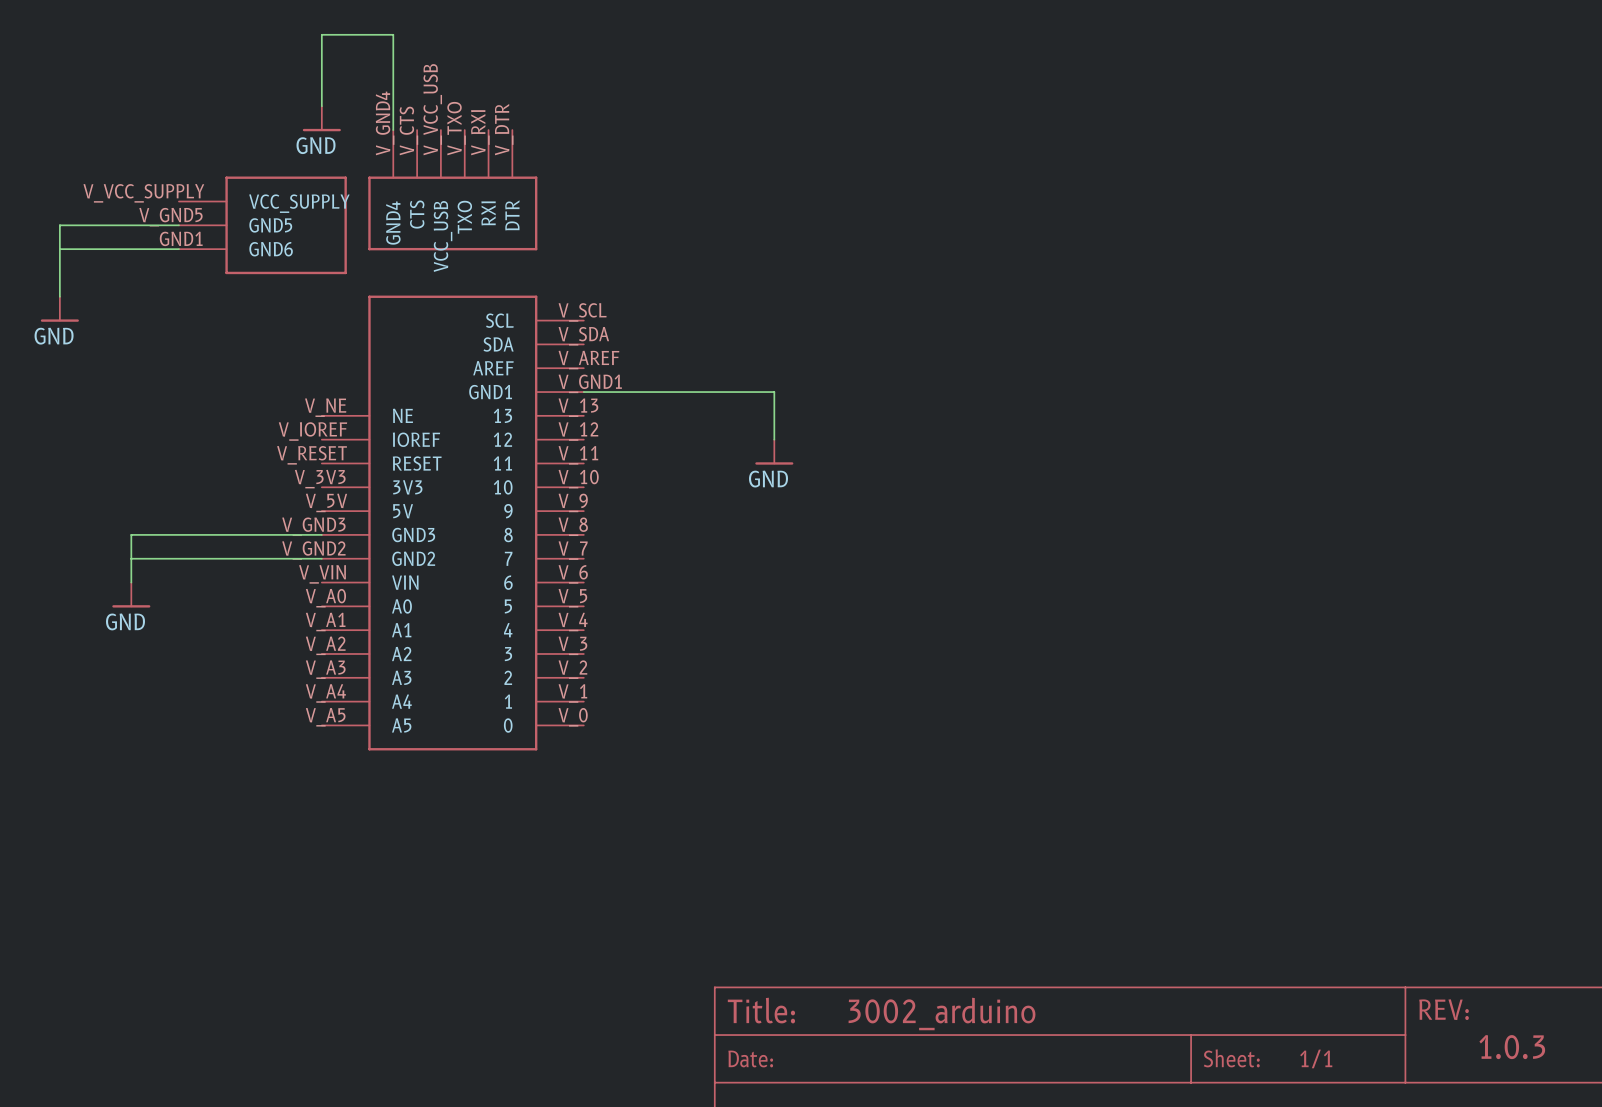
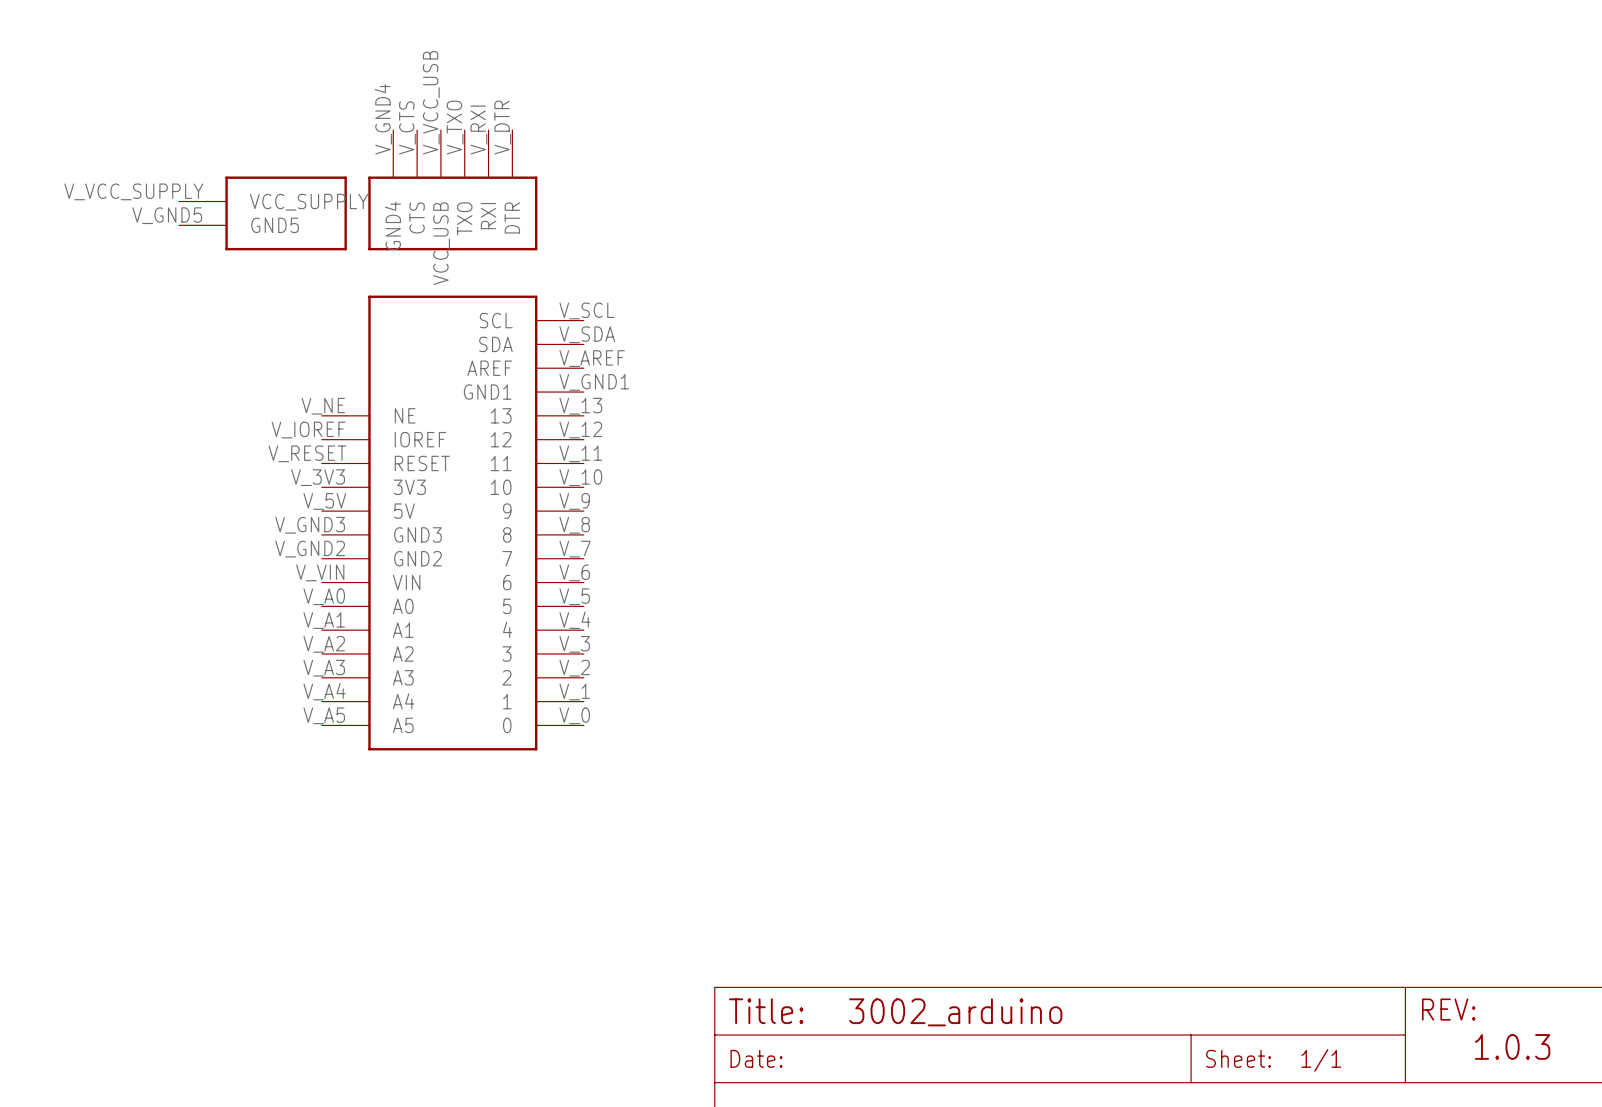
wire: (321, 106) (321, 34) (393, 34) (393, 130) -> none
power symbol: GND (321, 118) -> none
part symbol: [178, 130, 584, 751] -> [178, 130, 584, 751]
wire: (178, 225) (59, 225) (59, 296) -> none
wire: (59, 249) (178, 249) -> none
power symbol: GND (59, 309) -> none
wire: (583, 392) (774, 392) (774, 439) -> none
power symbol: GND (774, 452) -> none
wire: (321, 534) (131, 534) (131, 582) -> none
wire: (131, 558) (321, 558) -> none
power symbol: GND (131, 595) -> none

